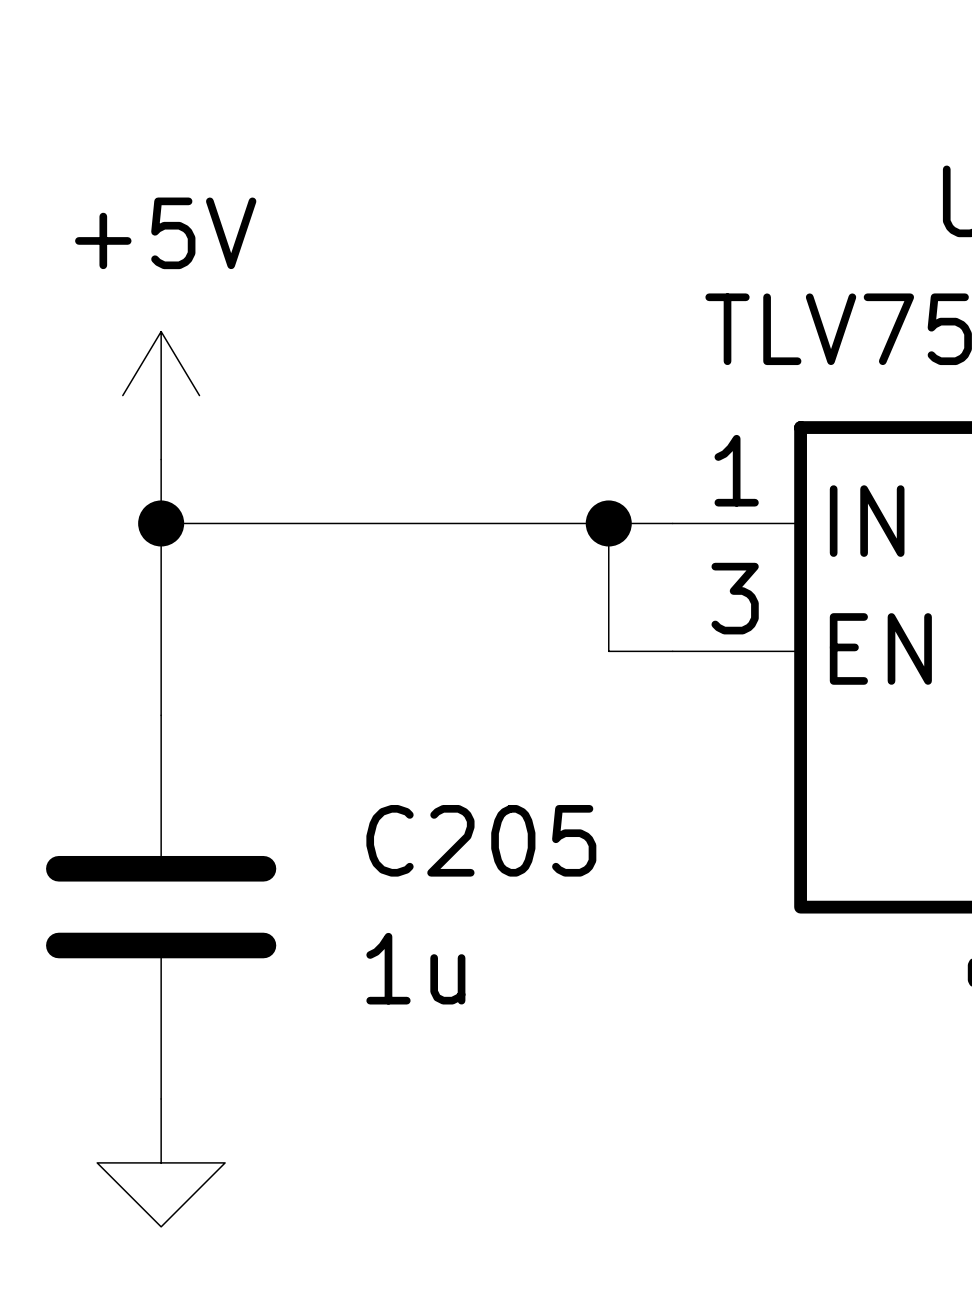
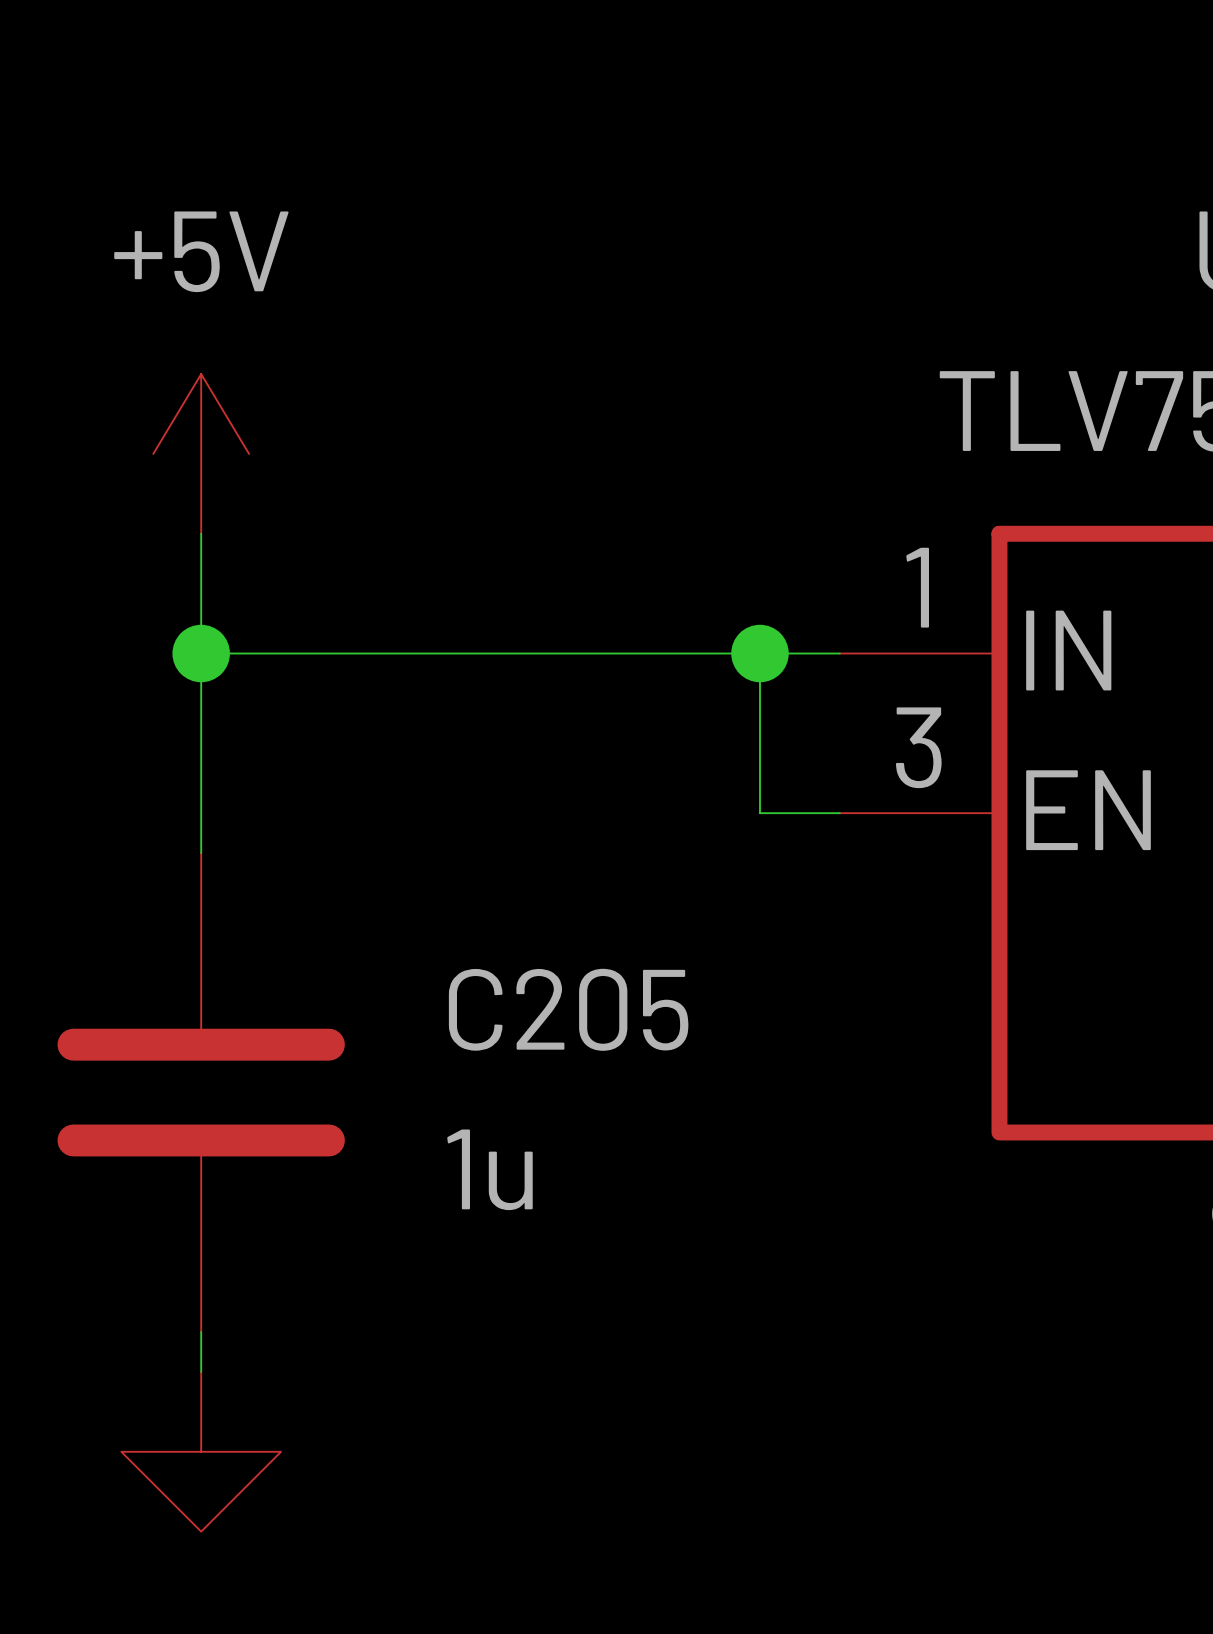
power symbol position: +5V (161, 395) -> +5V (201, 453)
C205 position: (161, 907) -> (201, 1092)

